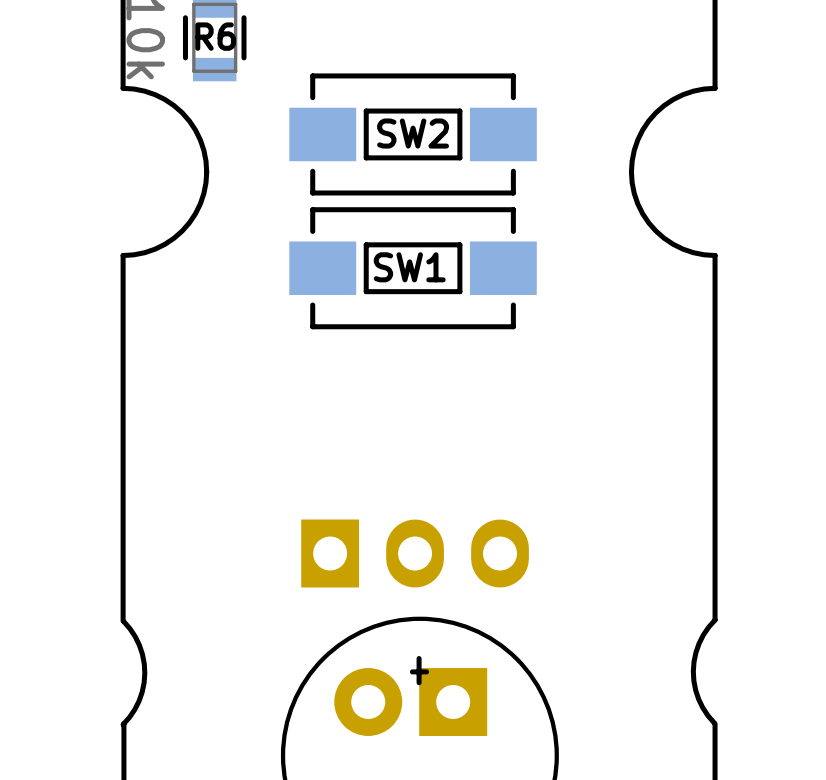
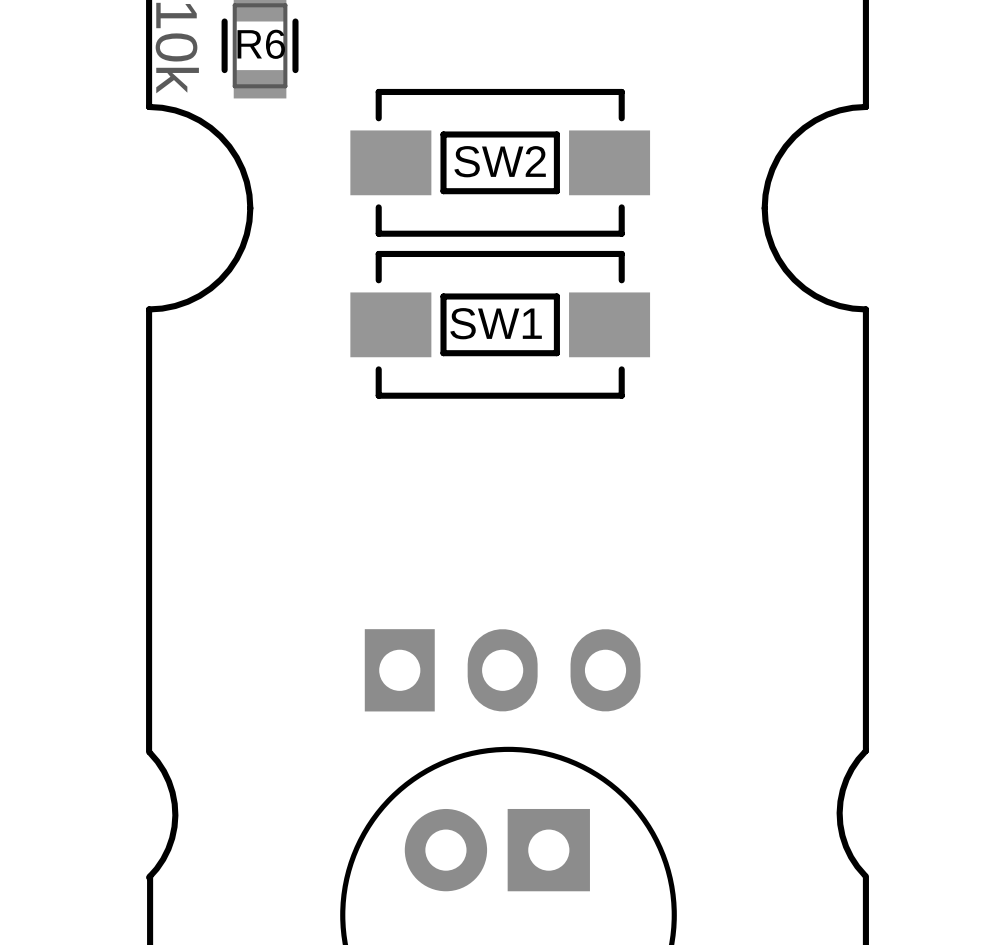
board edge: (419, 658) (419, 682) -> none
board edge: (426, 671) (412, 671) -> none

